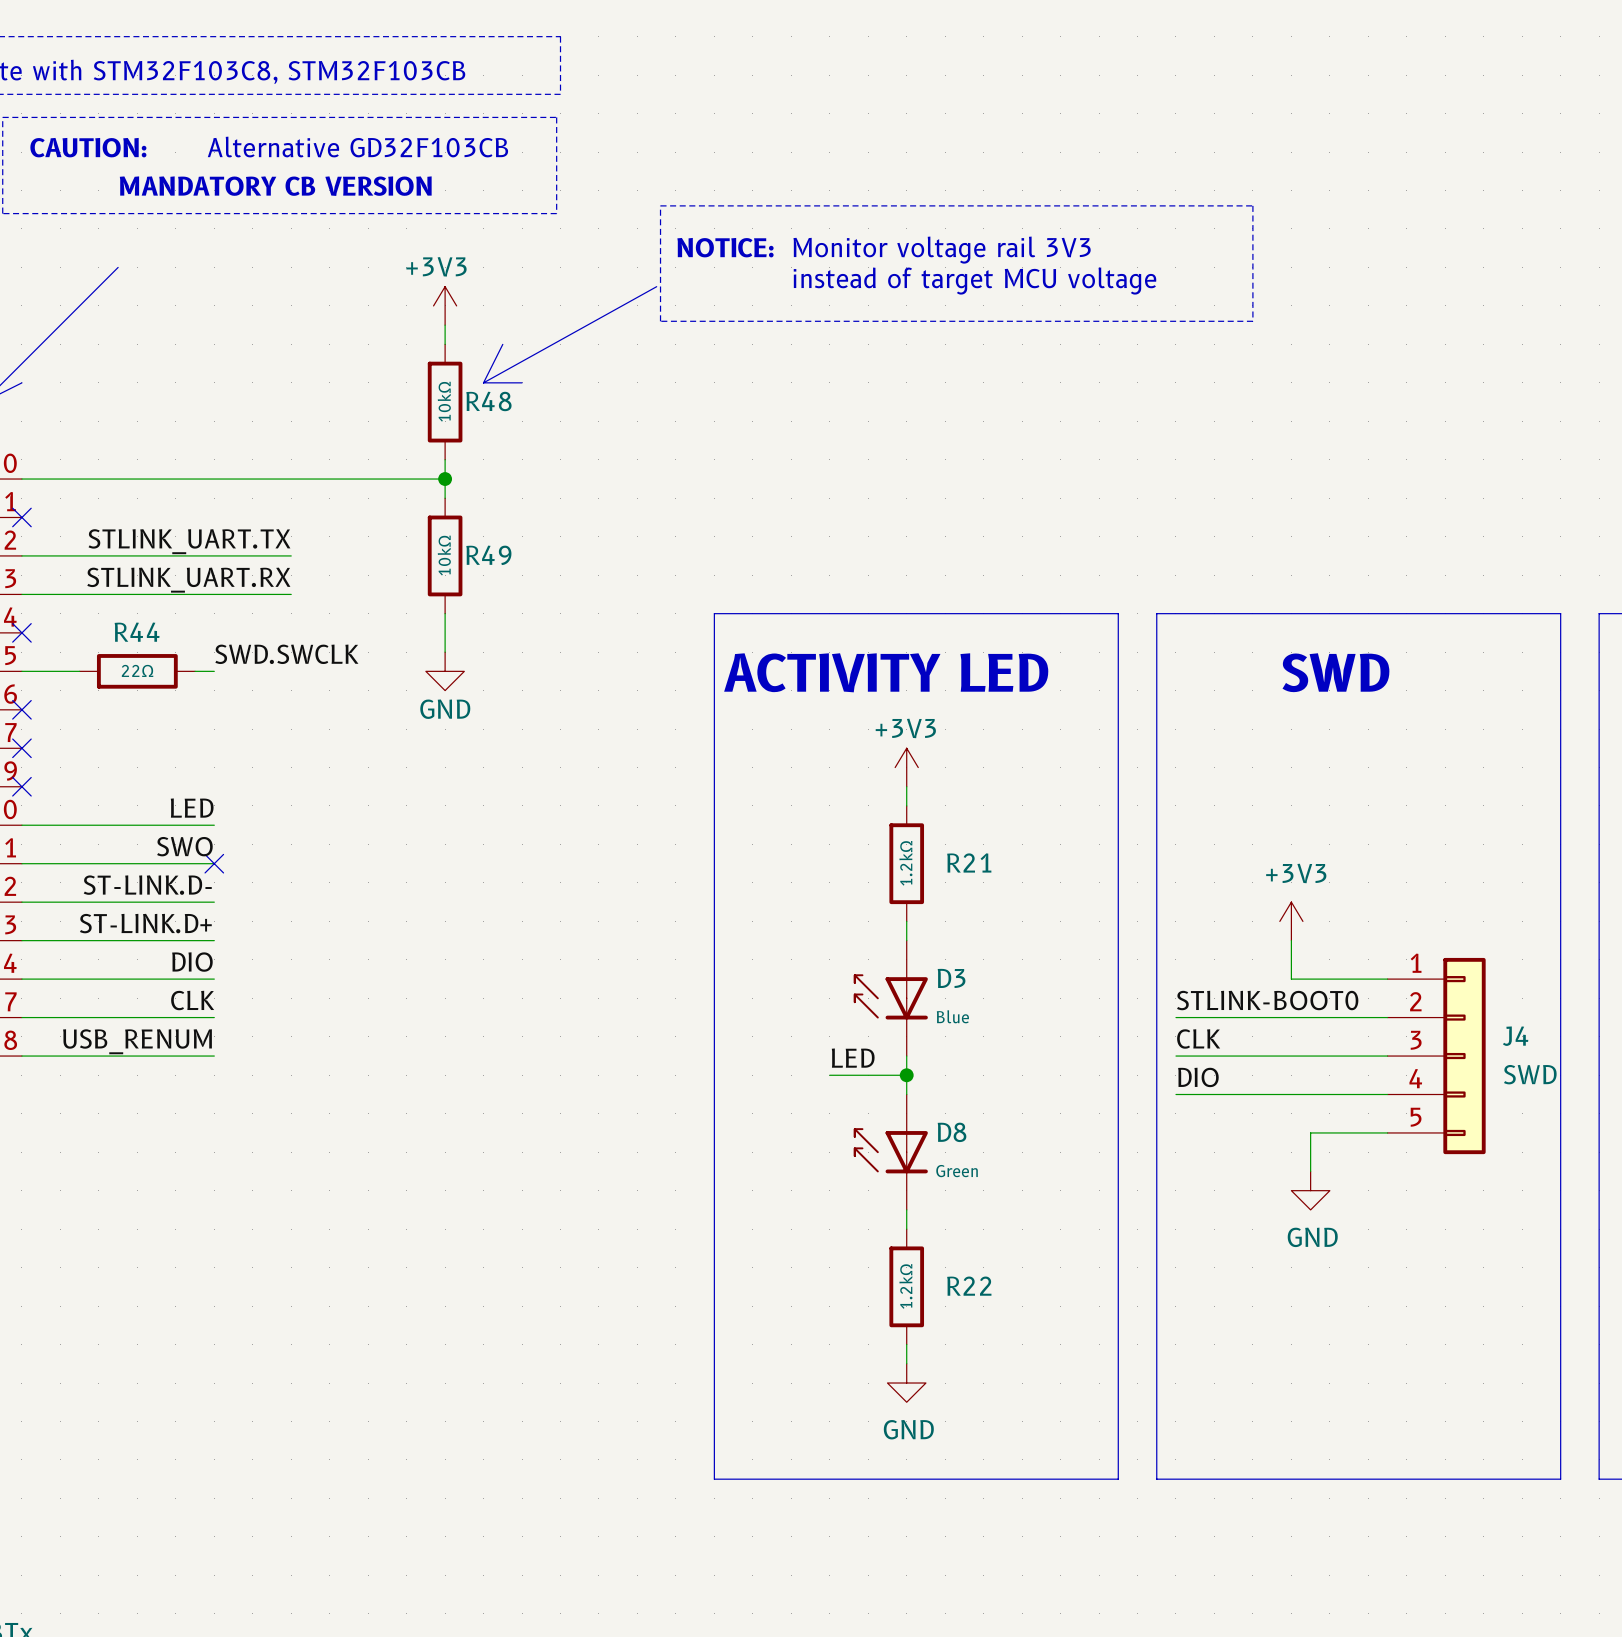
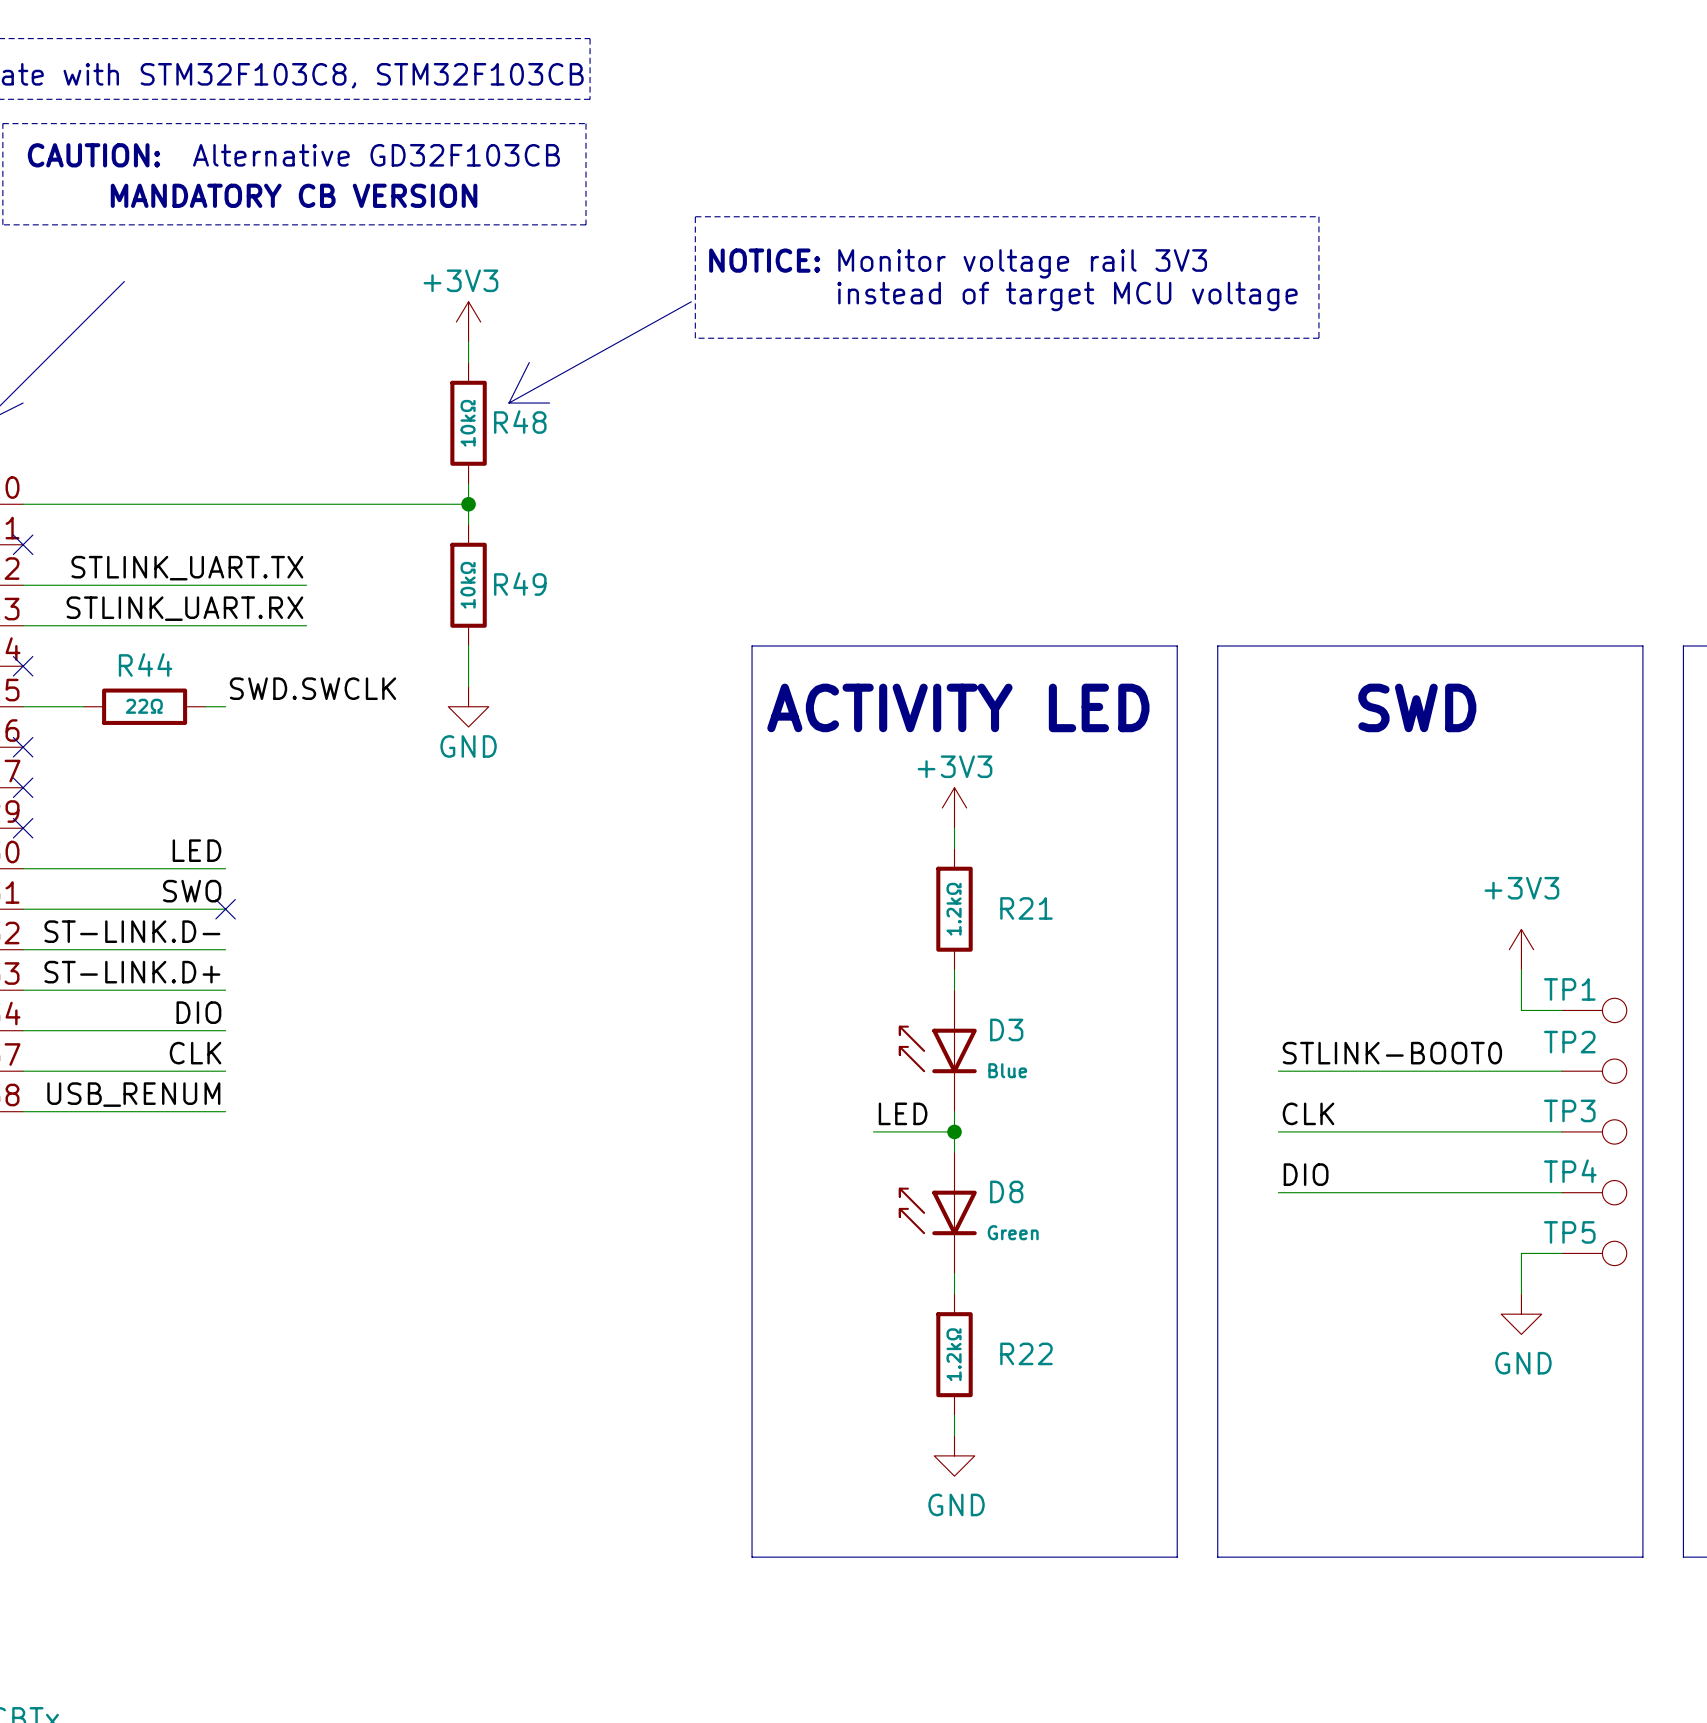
power symbol text position: +3V3 (1296, 873) -> +3V3 (1521, 888)
power symbol position: +3V3 (1291, 921) -> +3V3 (1521, 949)
wire: none -> (1521, 969) (1521, 1010) (1561, 1010)
wire: (1291, 940) (1291, 979) (1387, 979) -> none
TP1: none -> (1594, 1010)
label position: STLINK-BOOT0 (1267, 1000) -> STLINK-BOOT0 (1392, 1053)
wire: (1175, 1017) (1214, 1017) -> none
TP2: none -> (1594, 1071)
label position: CLK (1198, 1038) -> CLK (1308, 1113)
wire: (1175, 1056) (1387, 1056) -> none
J4: SWD (1436, 1056) -> none
wire: none -> (1278, 1131) (1561, 1131)
TP3: none -> (1594, 1131)
label position: DIO (1198, 1077) -> DIO (1306, 1174)
wire: (1175, 1094) (1387, 1094) -> none
wire: (1310, 1132) (1310, 1171) -> (1379, 1192) (1278, 1192)
TP4: none -> (1594, 1192)
power symbol position: GND (1310, 1190) -> GND (1521, 1314)
wire: none -> (1561, 1253) (1521, 1253) (1521, 1293)
TP5: none -> (1594, 1253)

